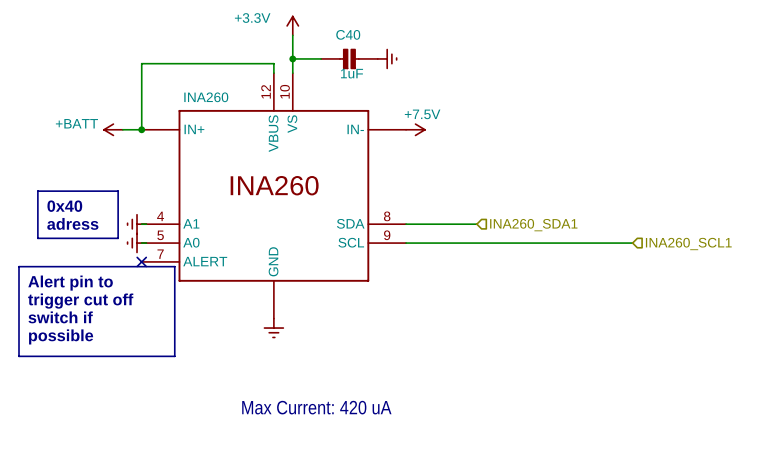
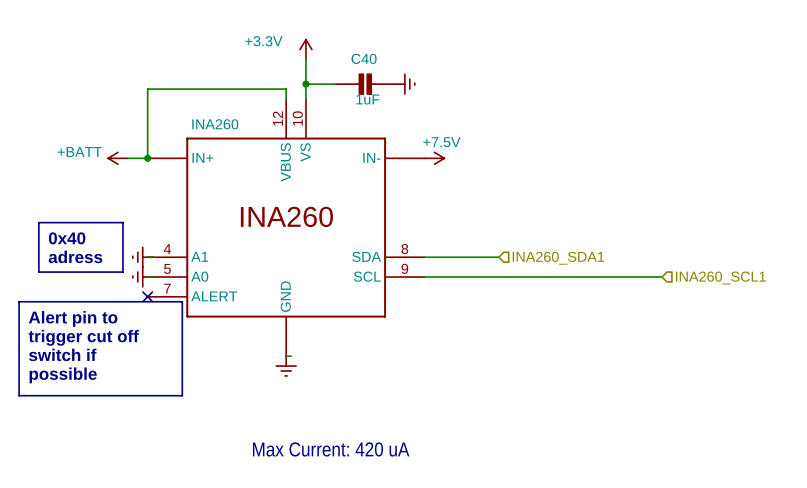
wire: none -> (286, 356) (291, 356)

